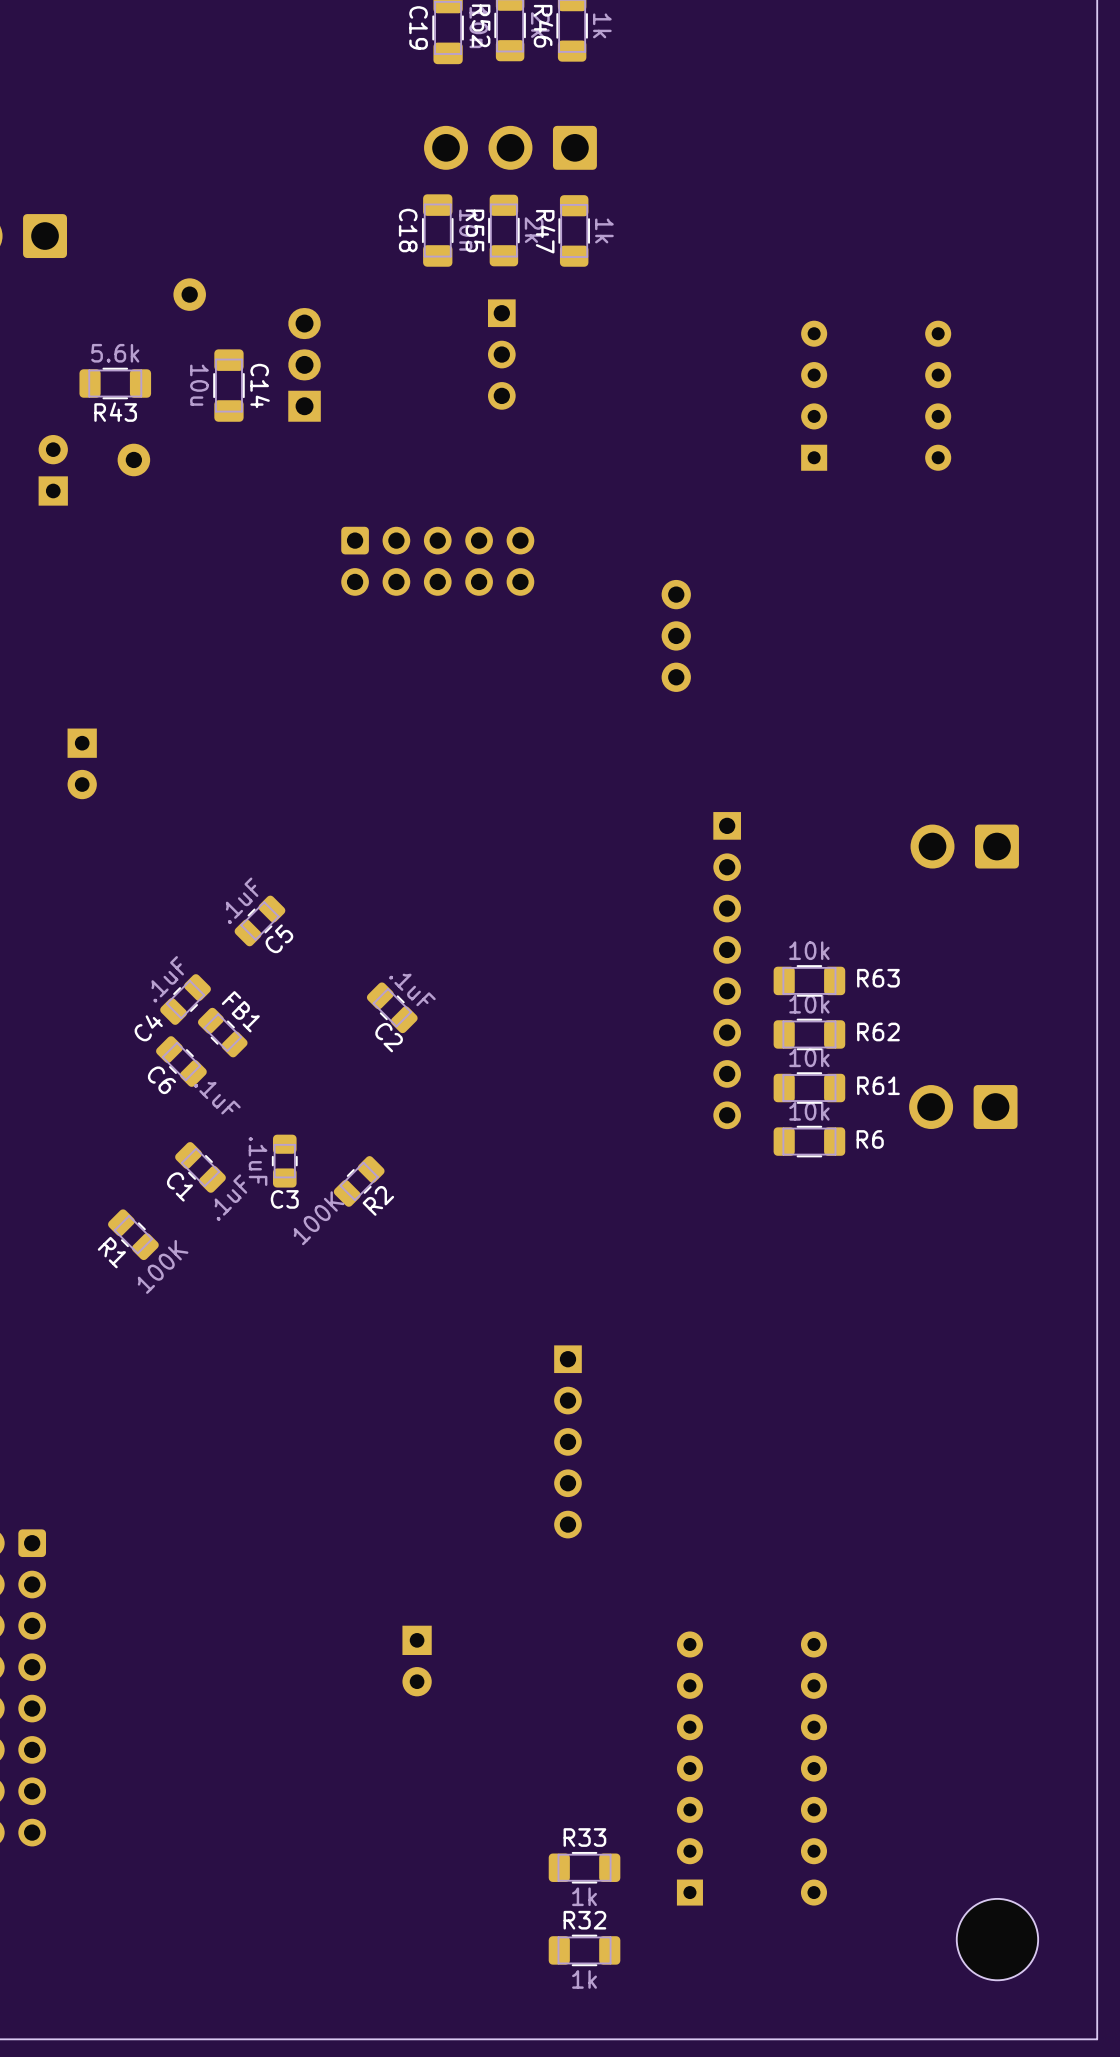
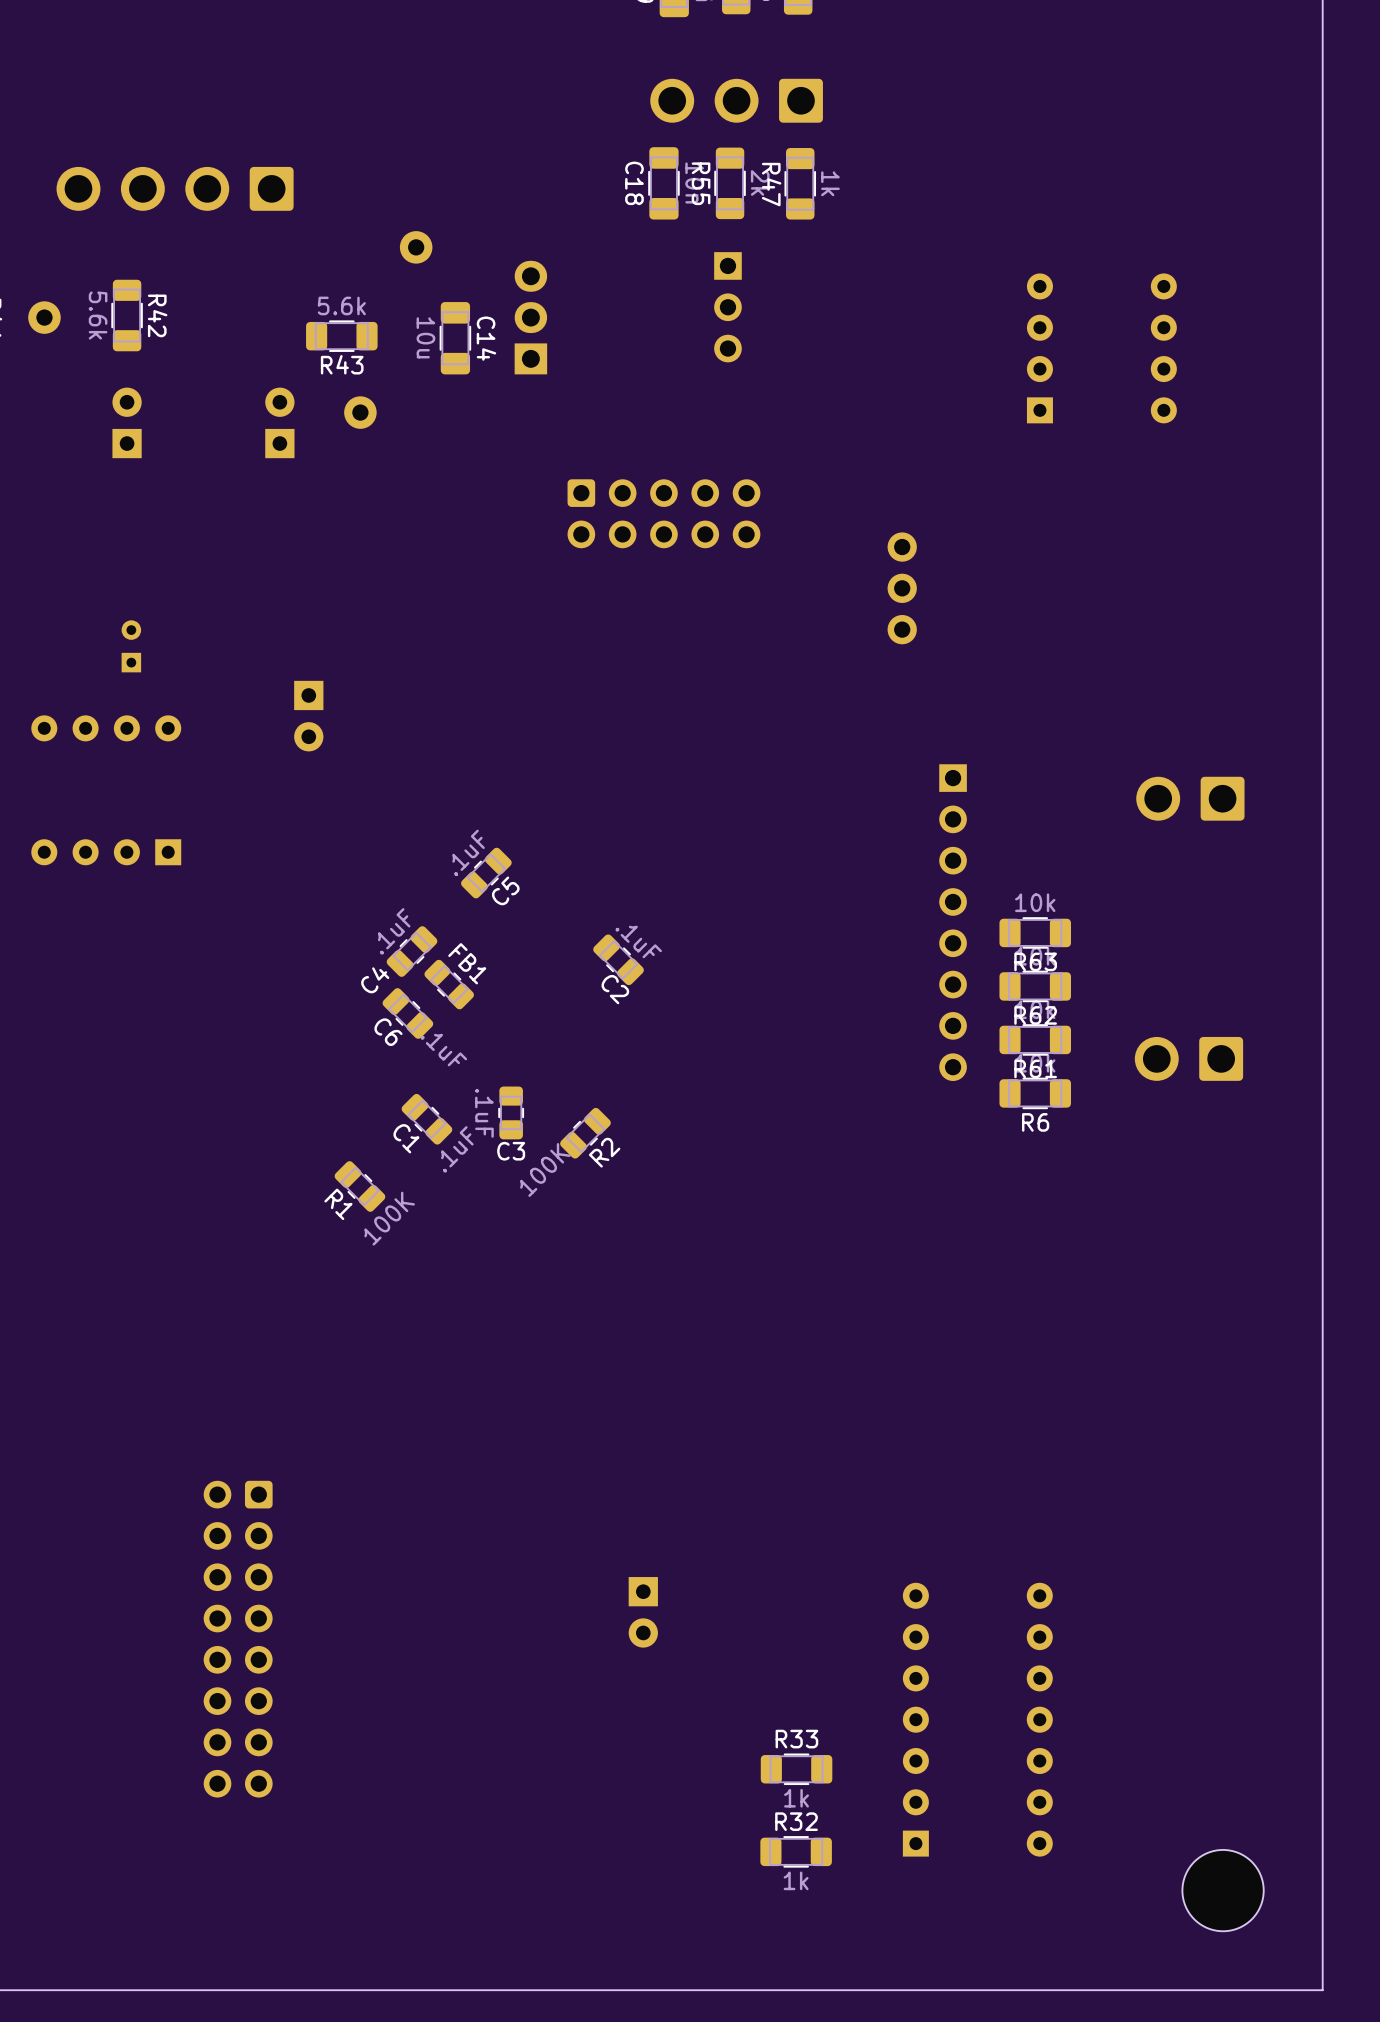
R63 name position: R63 (878, 978) -> R63 (1035, 961)
R62 name position: R62 (878, 1031) -> R62 (1035, 1015)
R61 name position: R61 (878, 1085) -> R61 (1035, 1068)
R6 name position: R6 (870, 1139) -> R6 (1035, 1122)
part: (567, 1441) -> none
R33 position: (584, 1867) -> (796, 1769)
R32 position: (584, 1950) -> (796, 1851)

